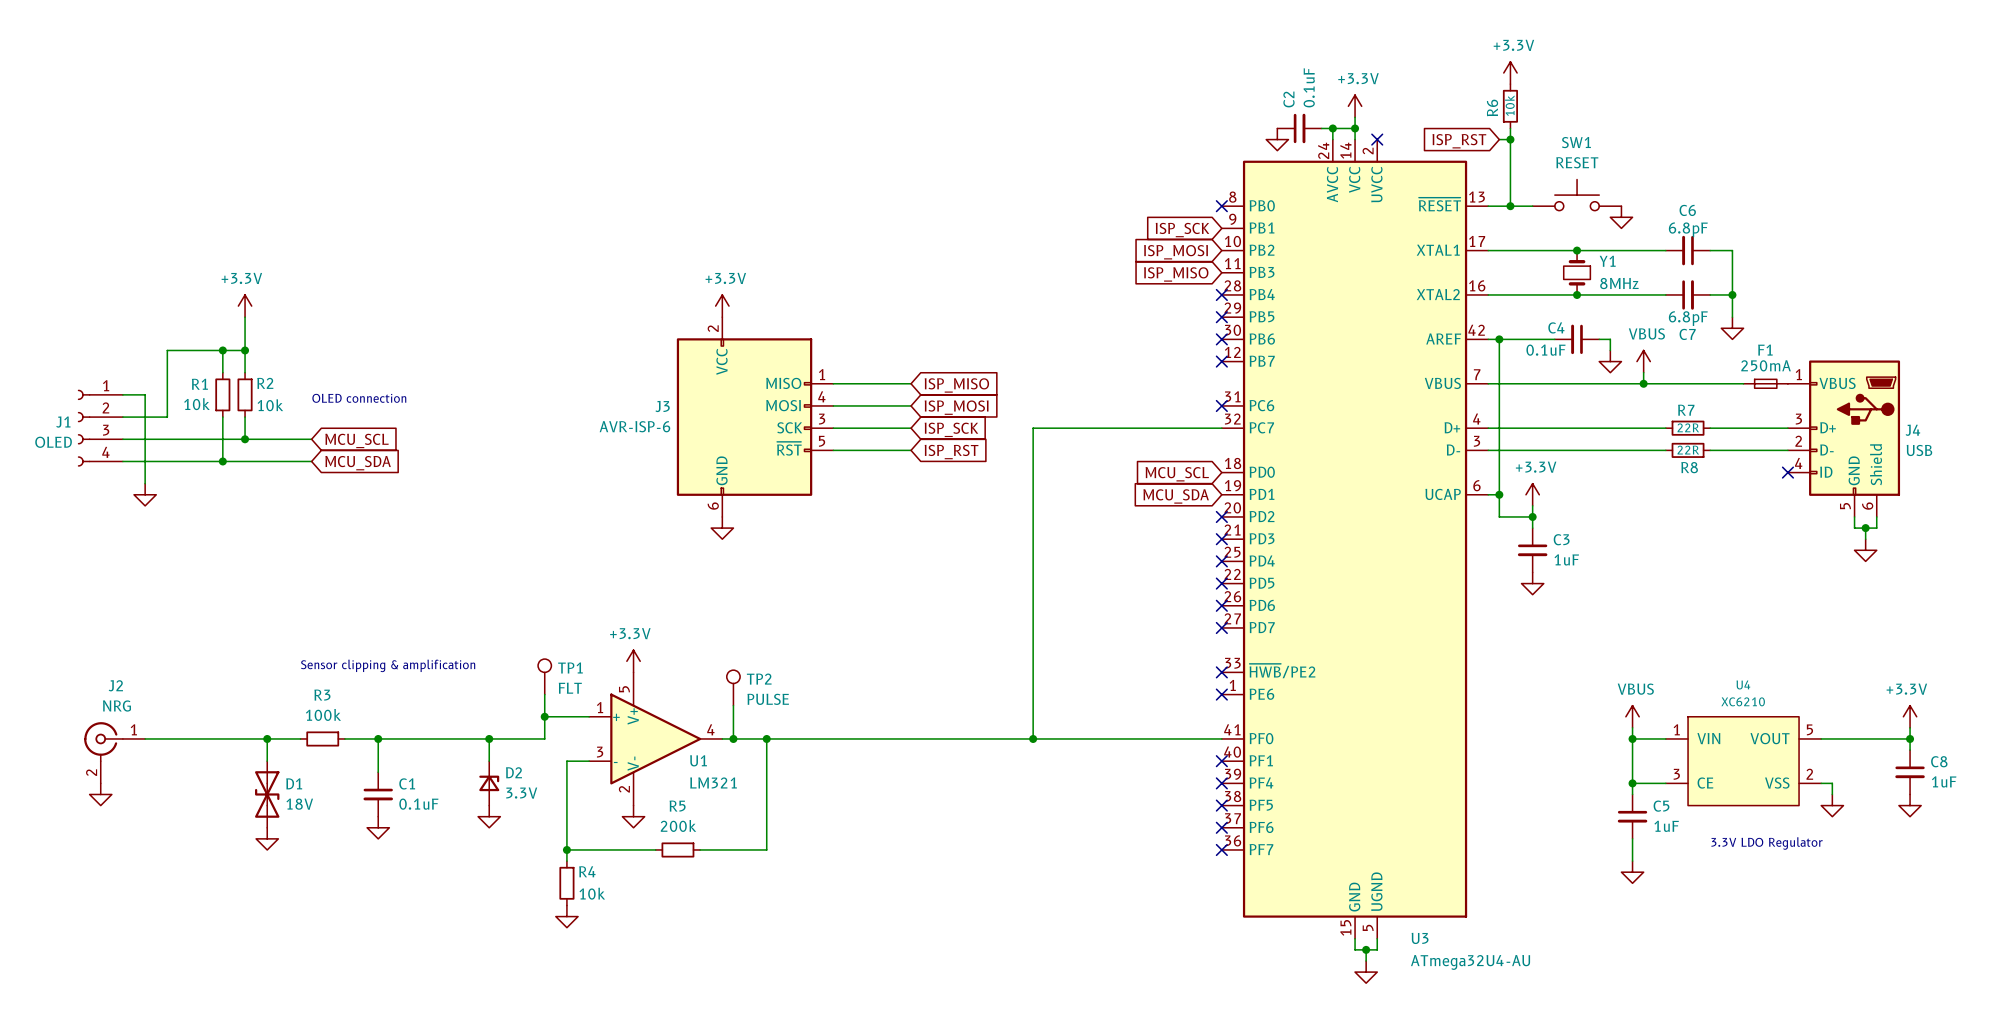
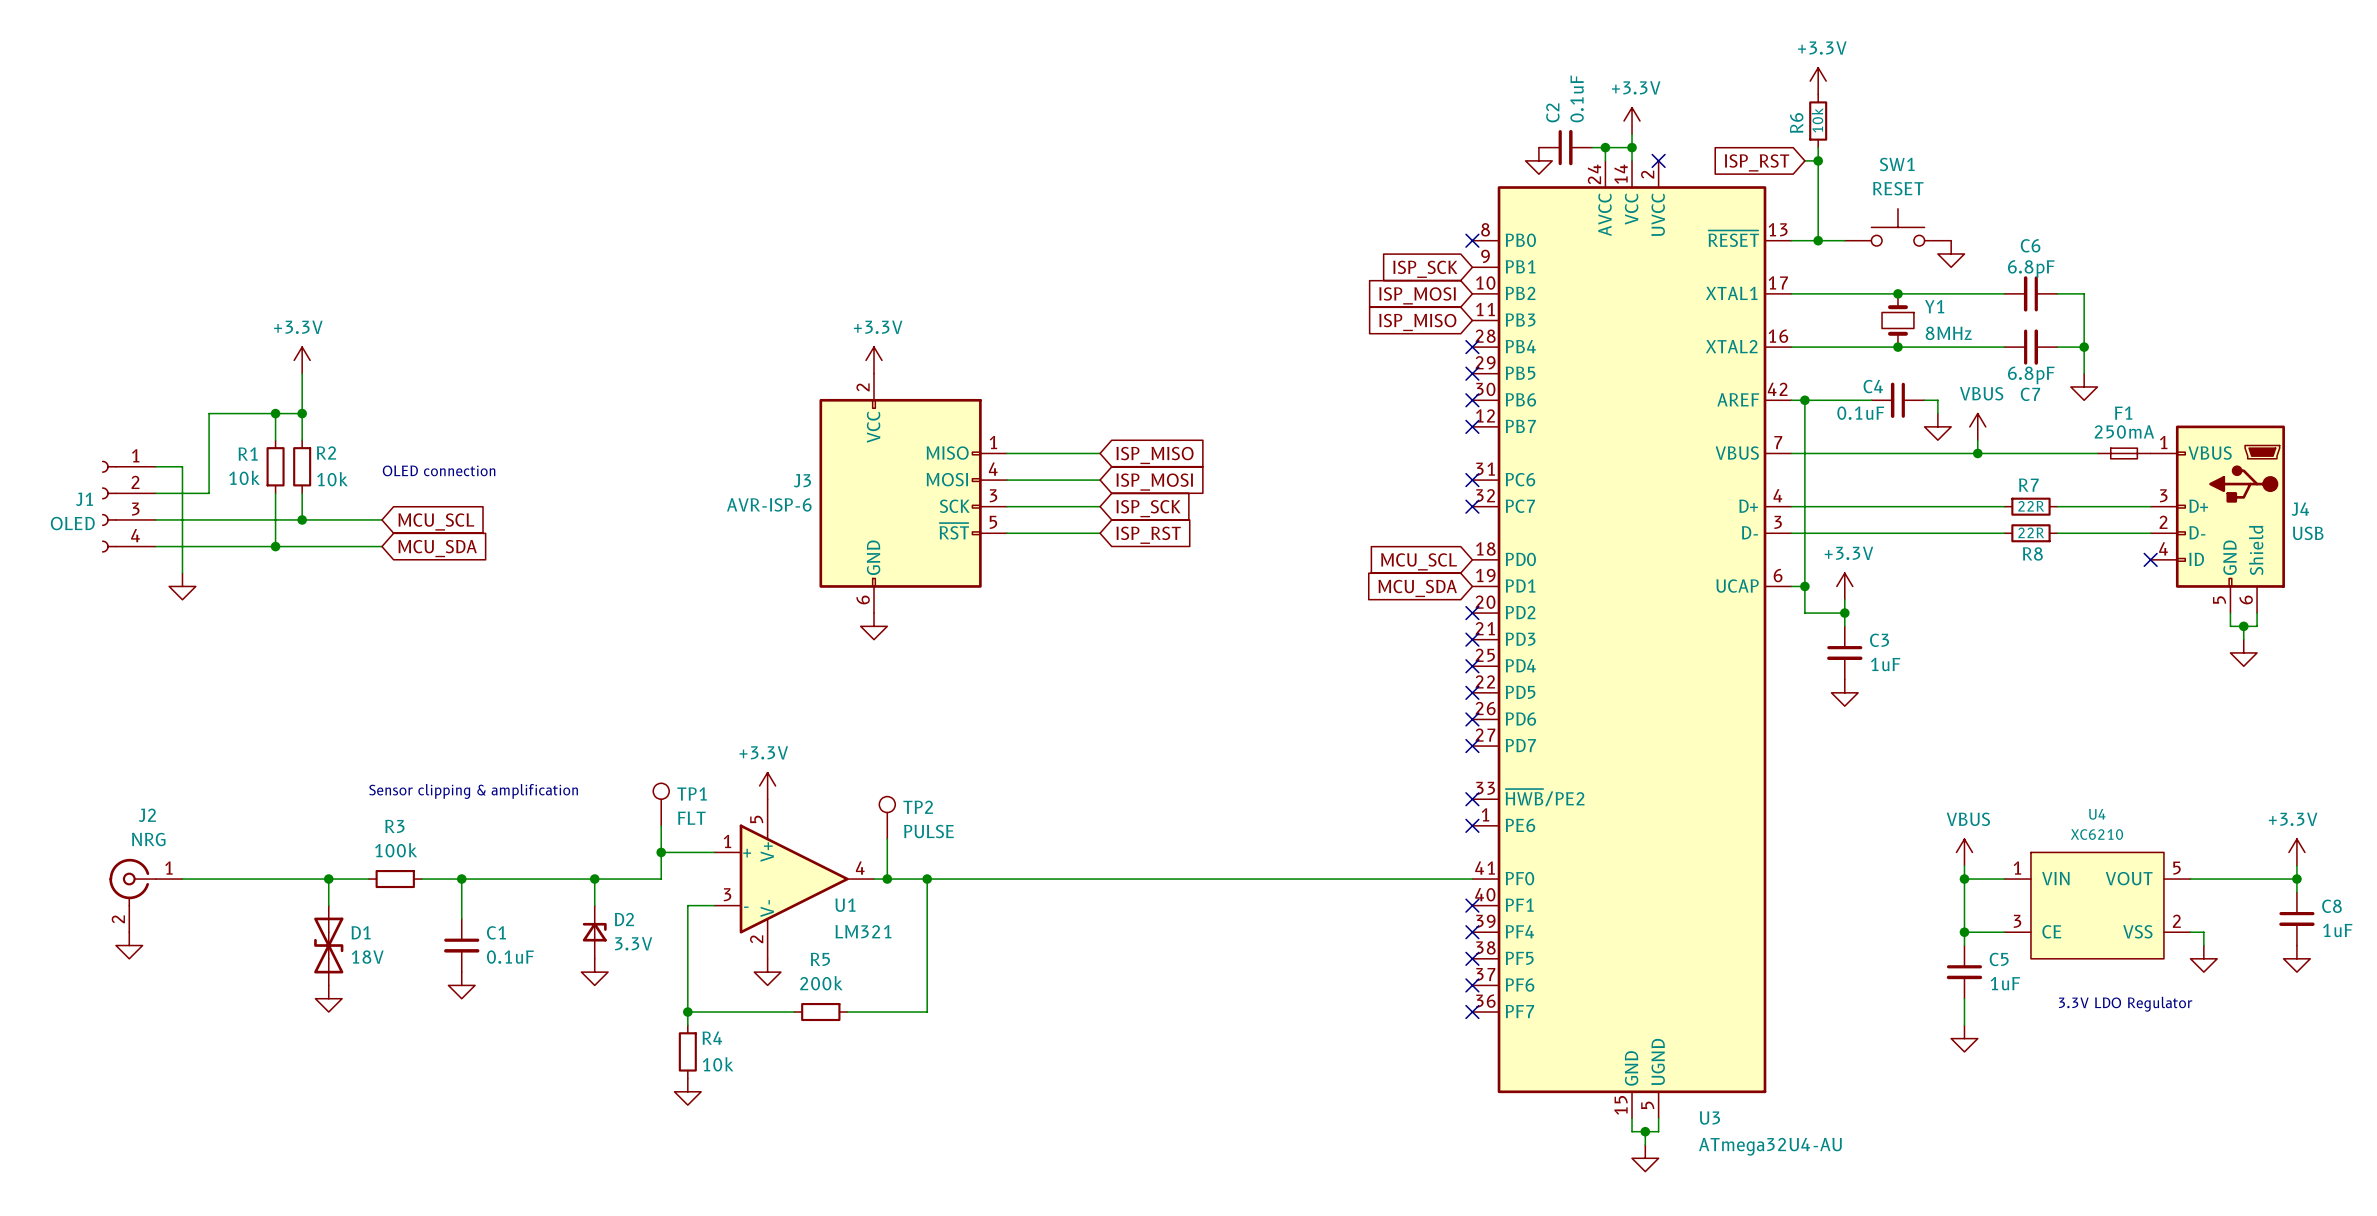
wire: (1221, 428) (1033, 428) (1033, 738) -> none
no-connect mark: none -> (1472, 506)
junction: (1033, 738) -> none

